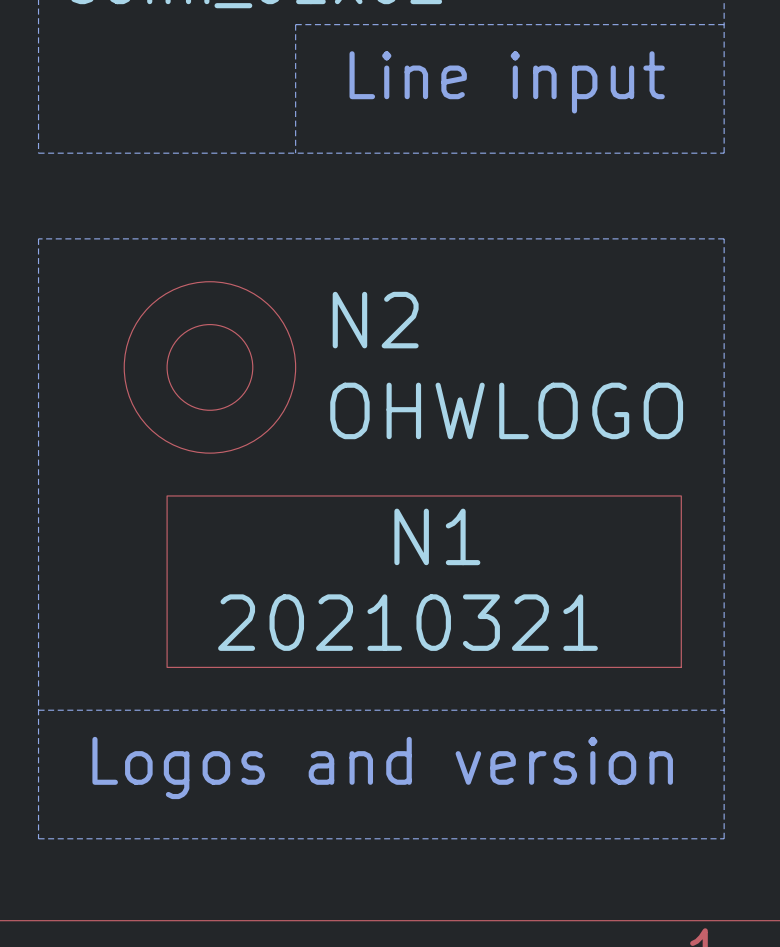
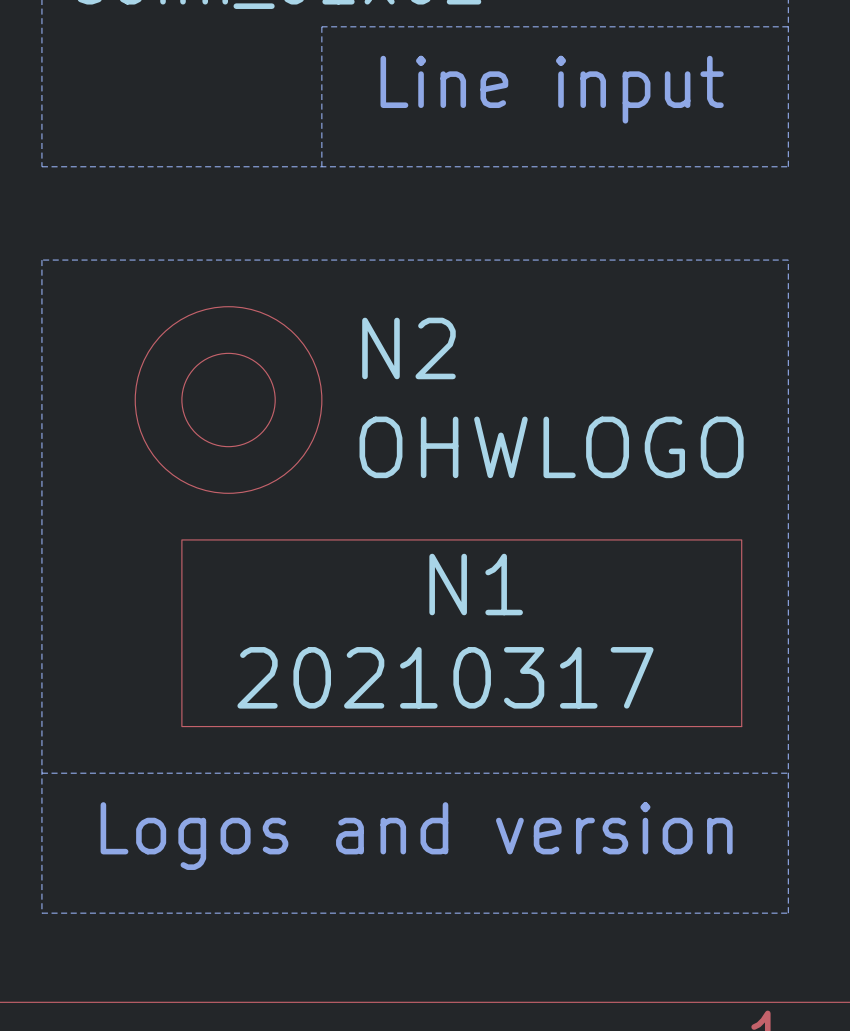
N1 value: 20210321 (407, 622) -> 20210317 (445, 677)

